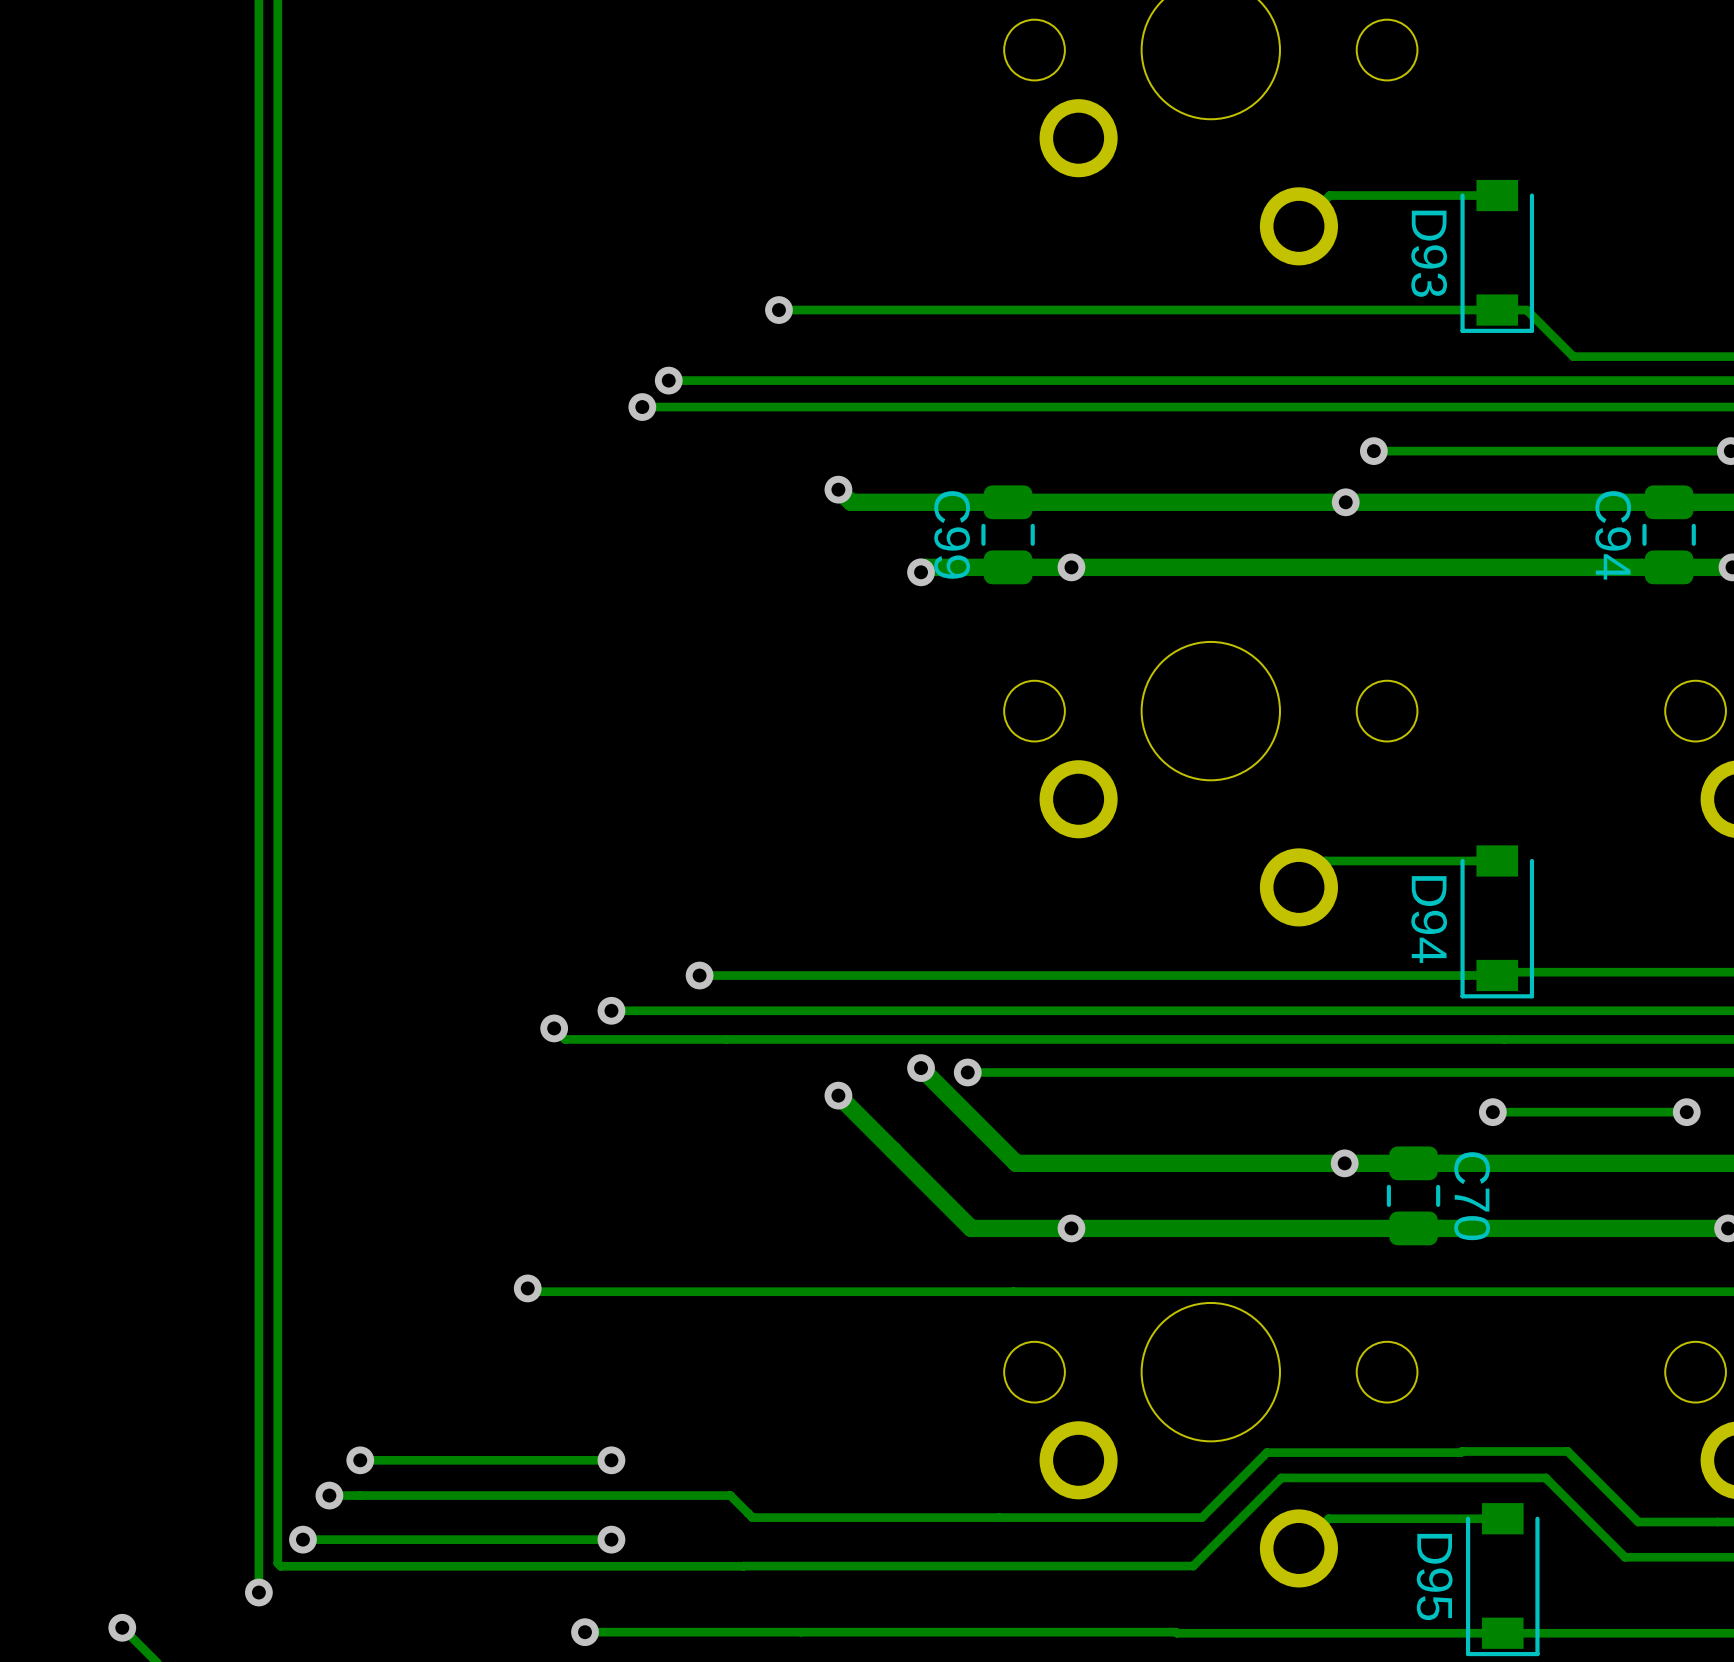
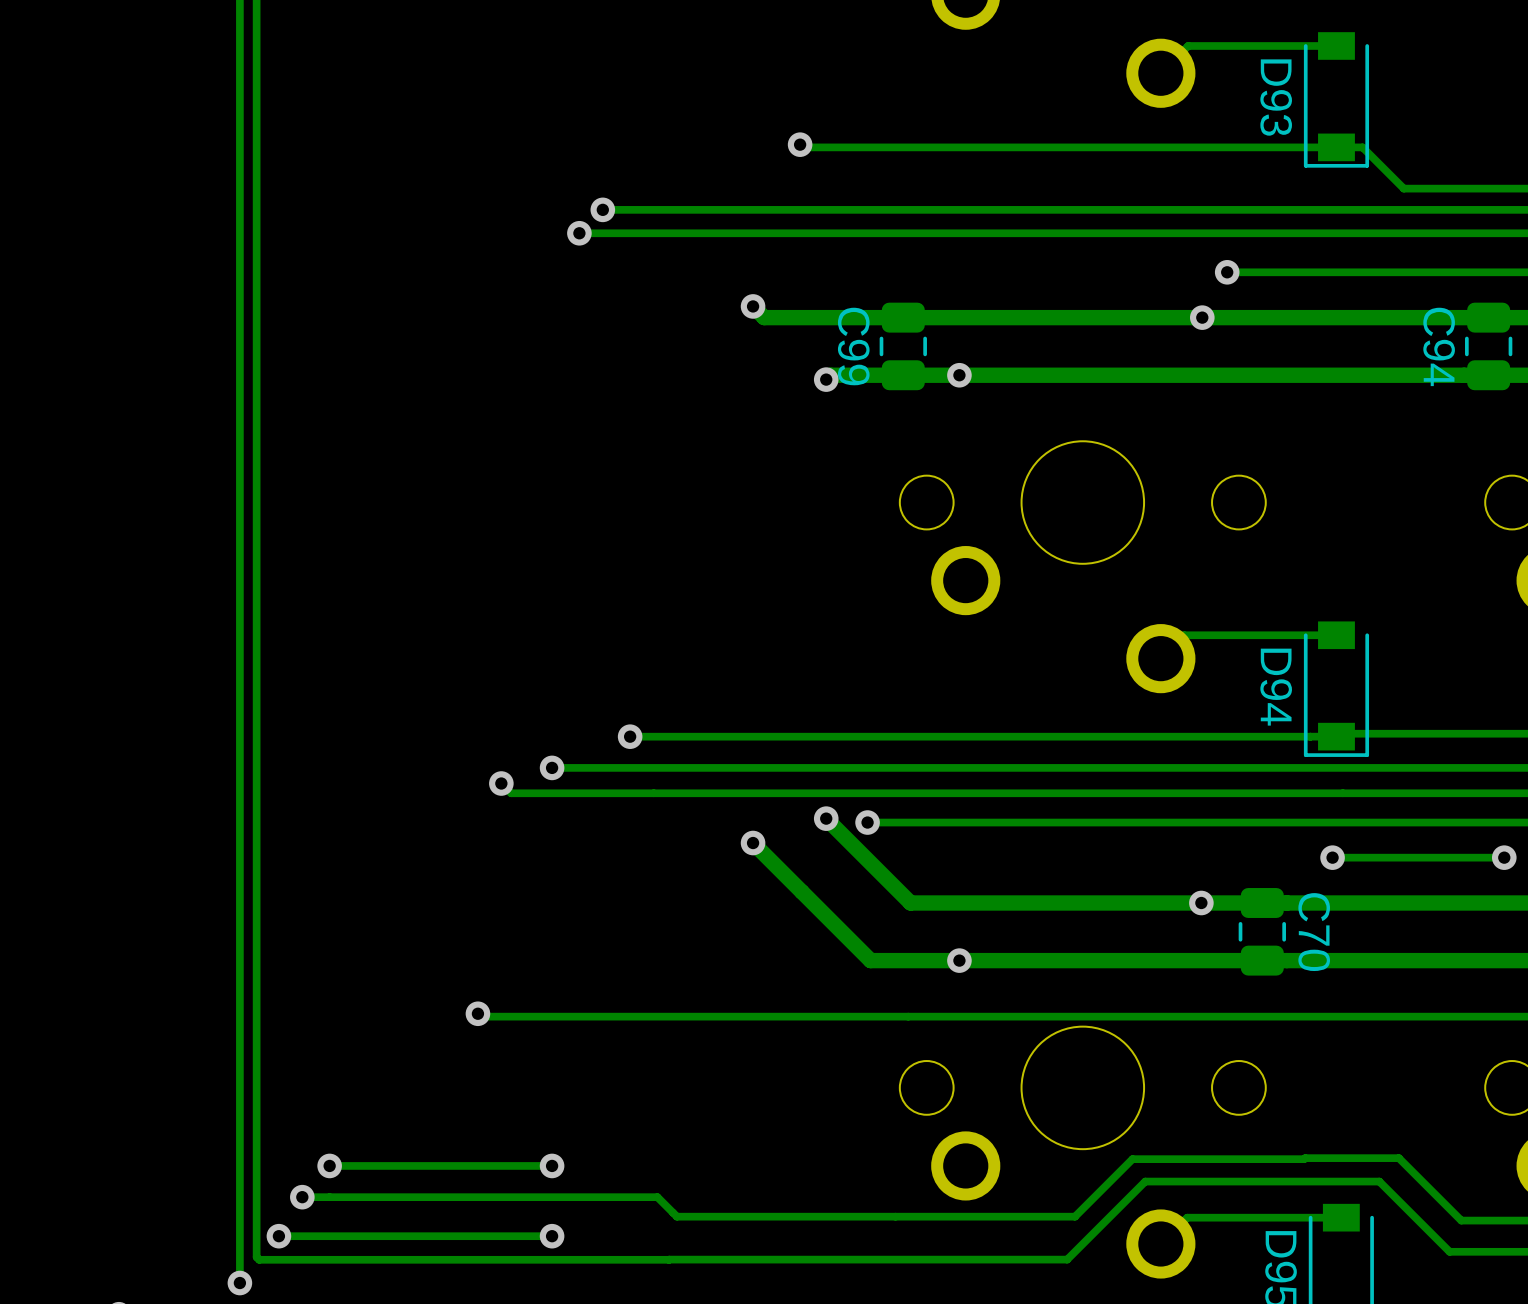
via position: (778, 310) -> (800, 144)
track: (894, 310) (778, 310) -> none

